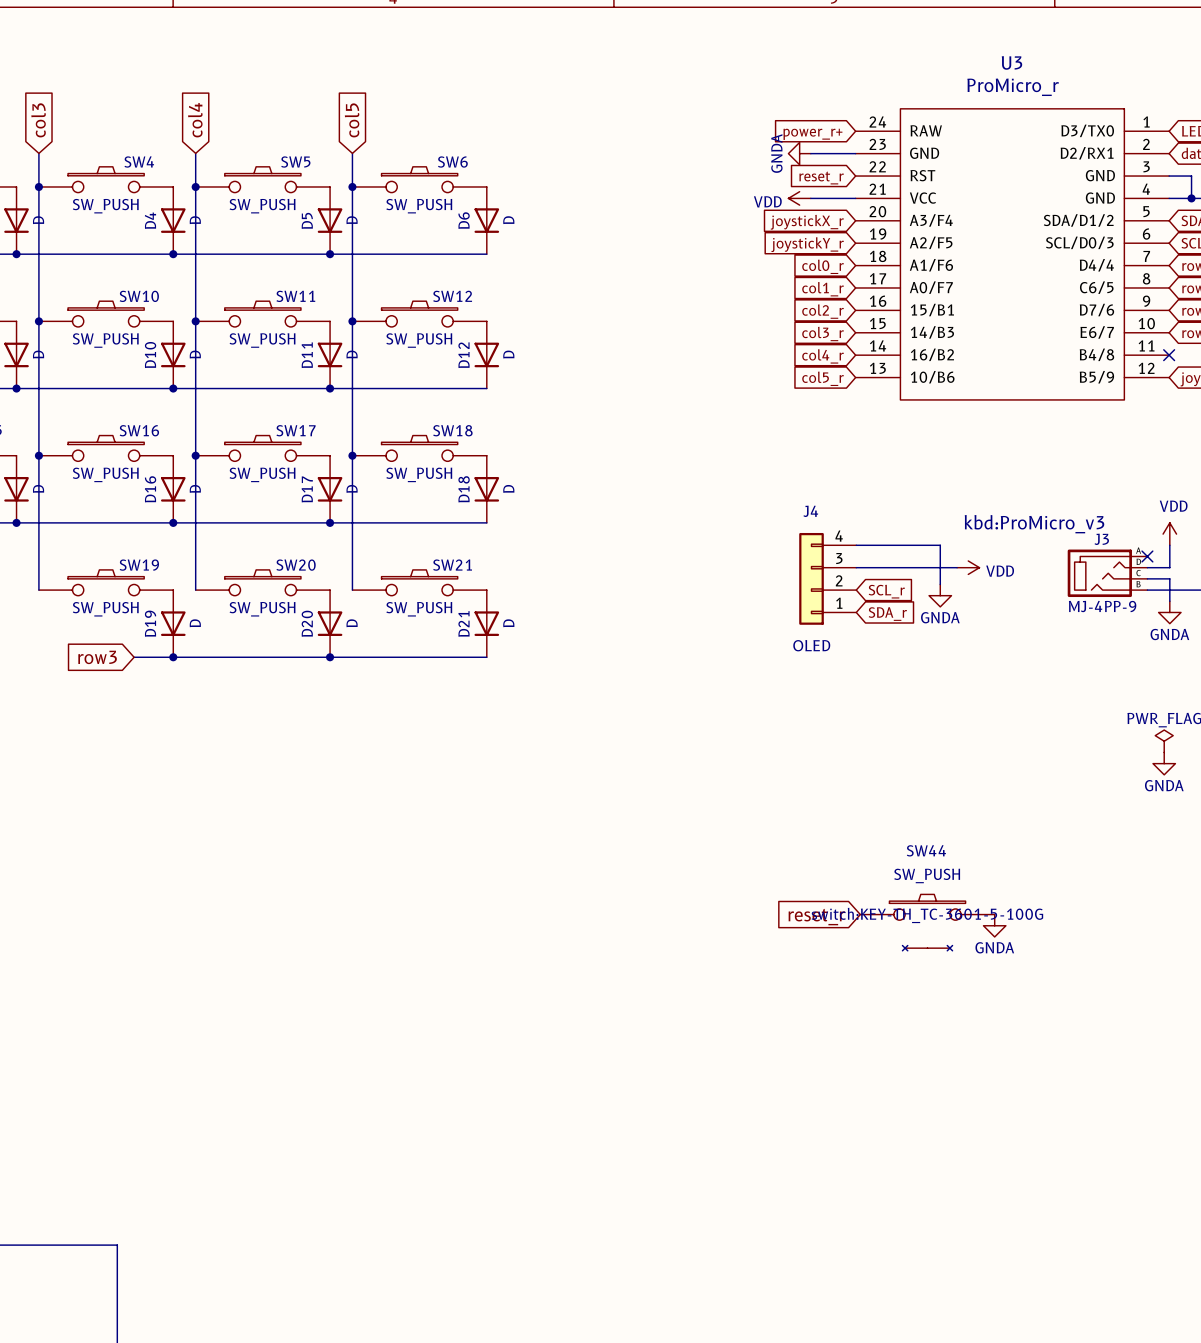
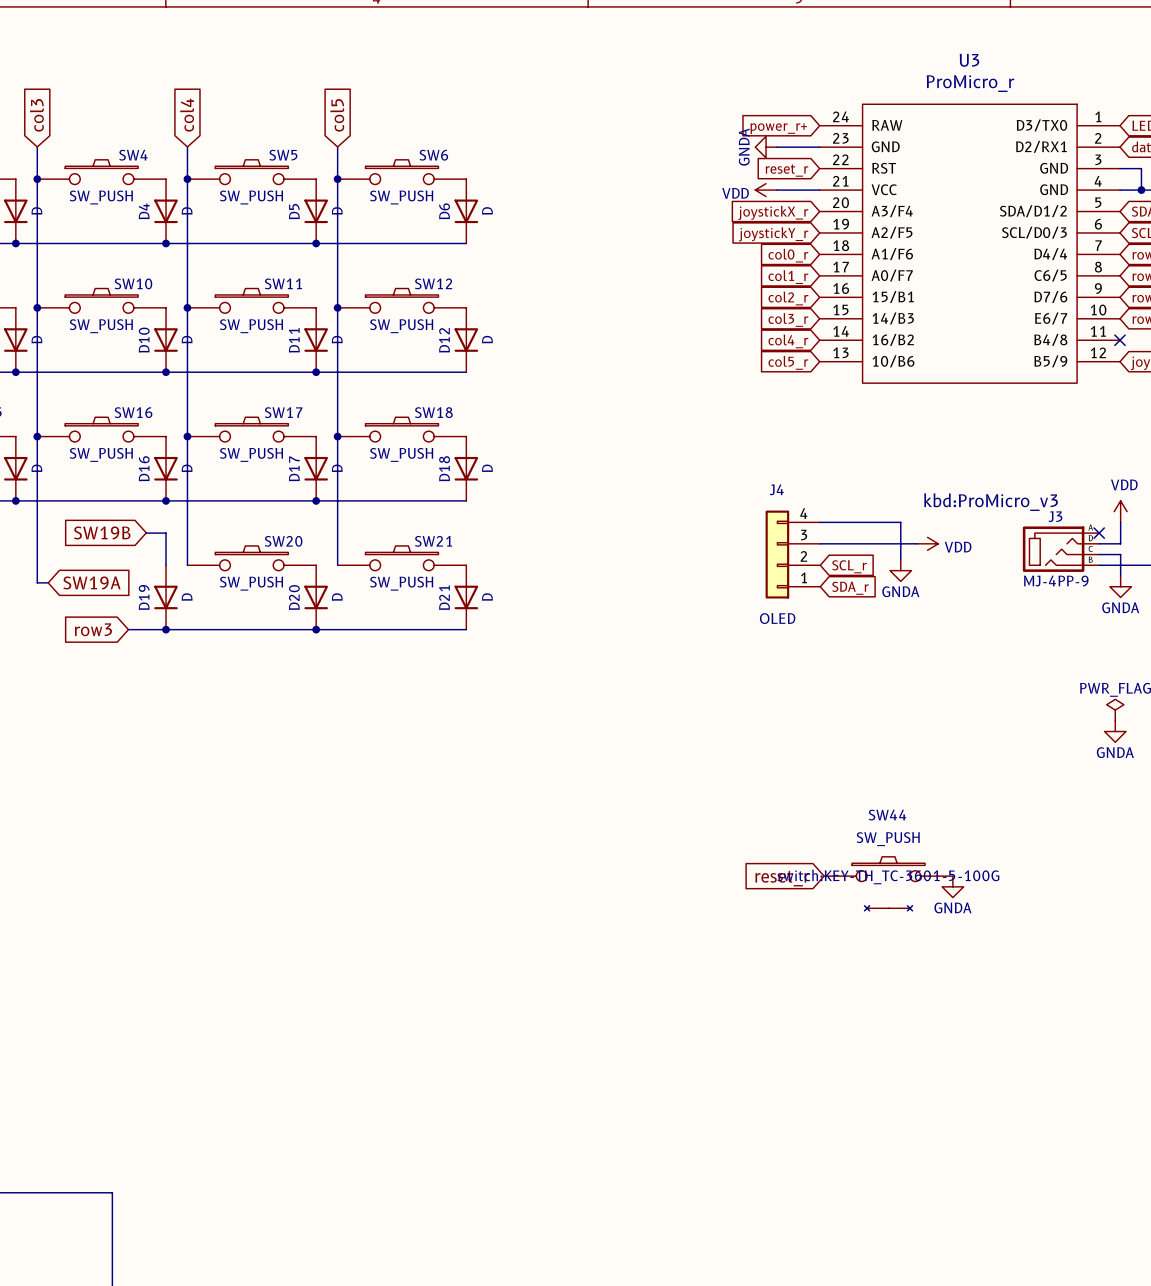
global label: none -> SW19B (102, 532)
wire: none -> (146, 532) (166, 533) (166, 565)
SW19: SW_PUSH (106, 582) -> none
wire: none -> (37, 565) (37, 582) (48, 582)
global label: none -> SW19A (92, 582)

